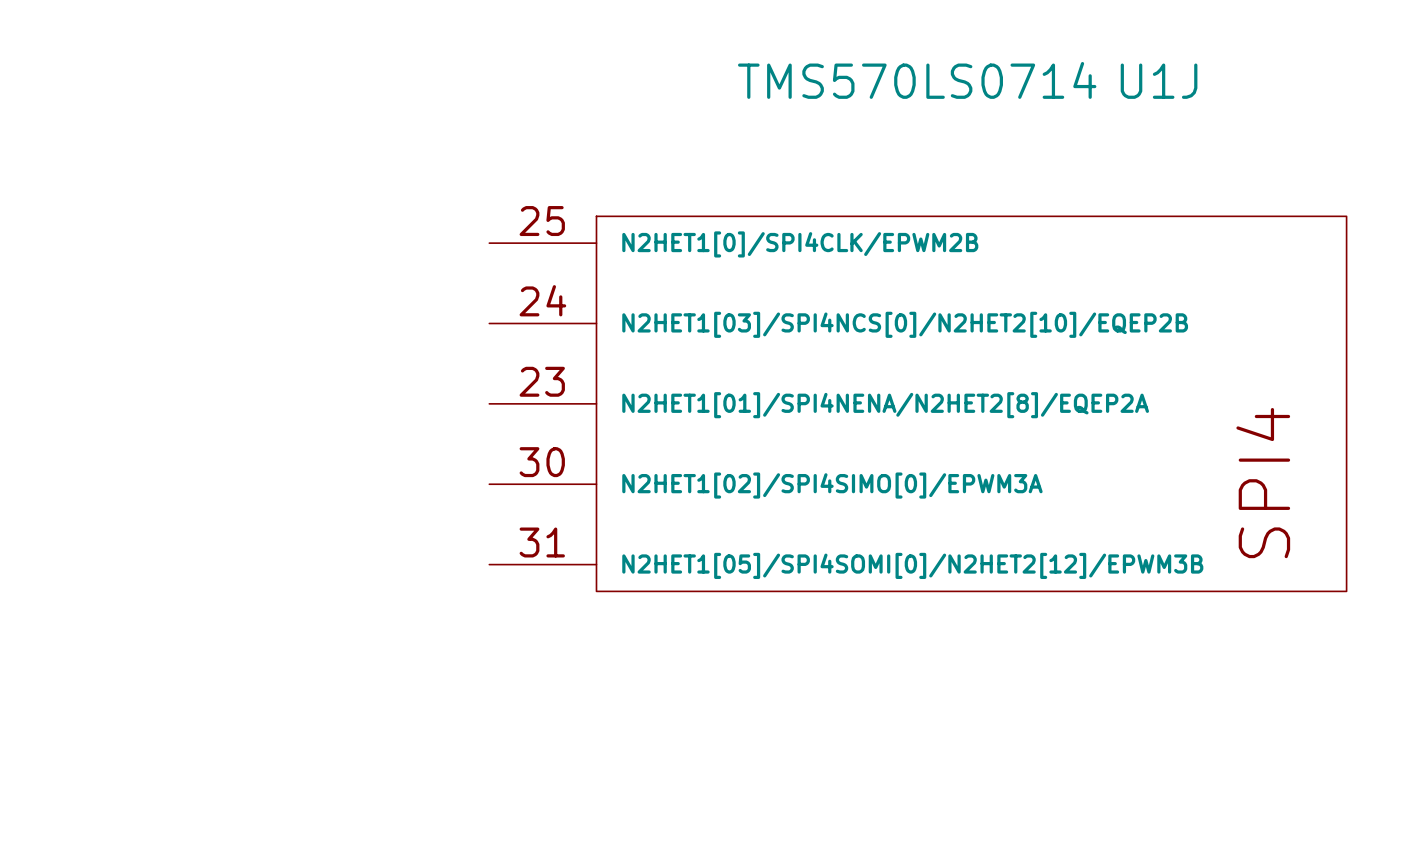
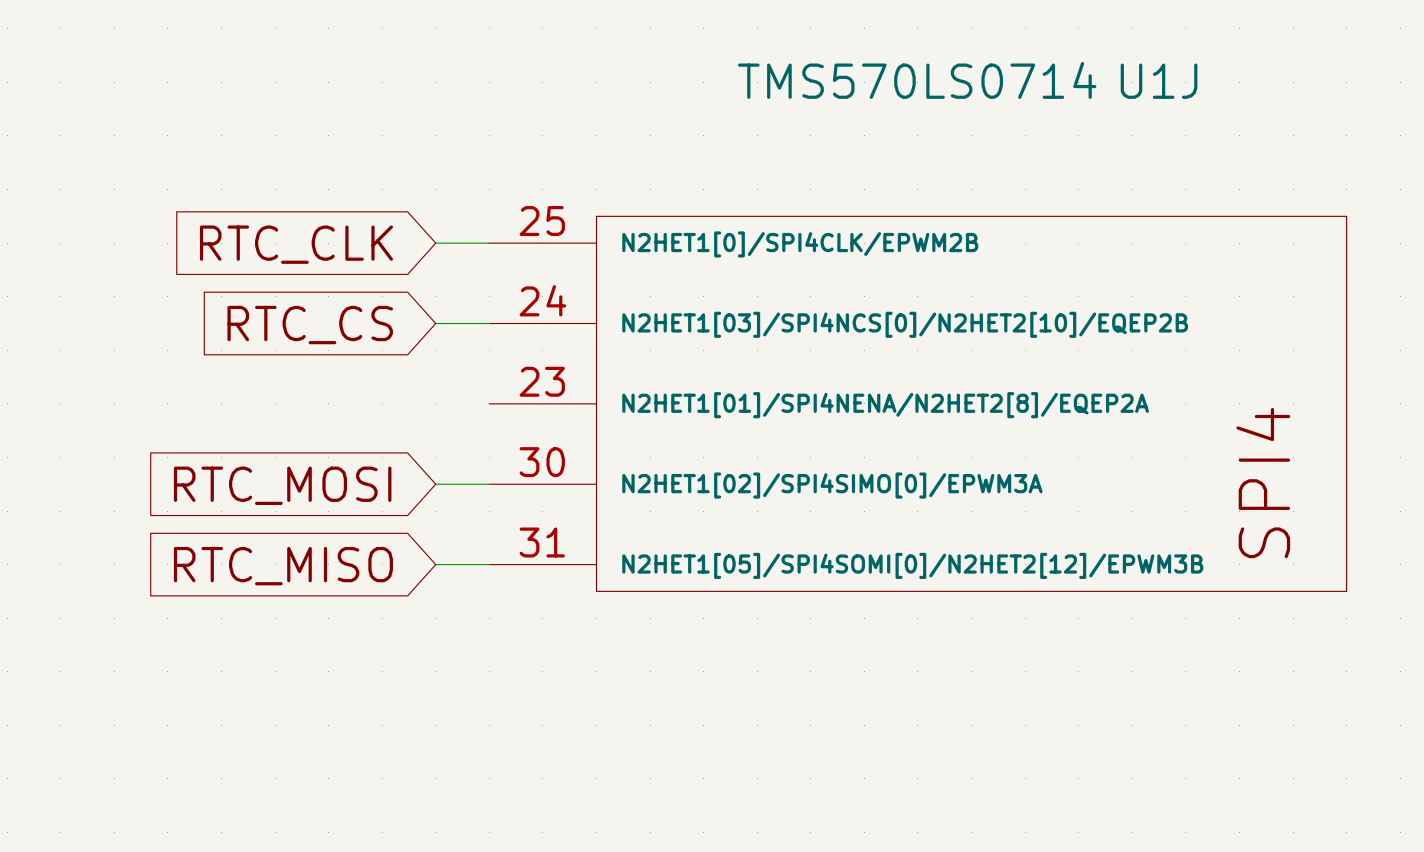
wire: none -> (435, 243) (489, 243)
global label: none -> RTC_CLK (296, 244)
wire: none -> (435, 323) (489, 323)
global label: none -> RTC_CS (310, 325)
wire: none -> (435, 484) (489, 484)
global label: none -> RTC_MOSI (282, 485)
wire: none -> (435, 564) (489, 564)
global label: none -> RTC_MISO (283, 566)

